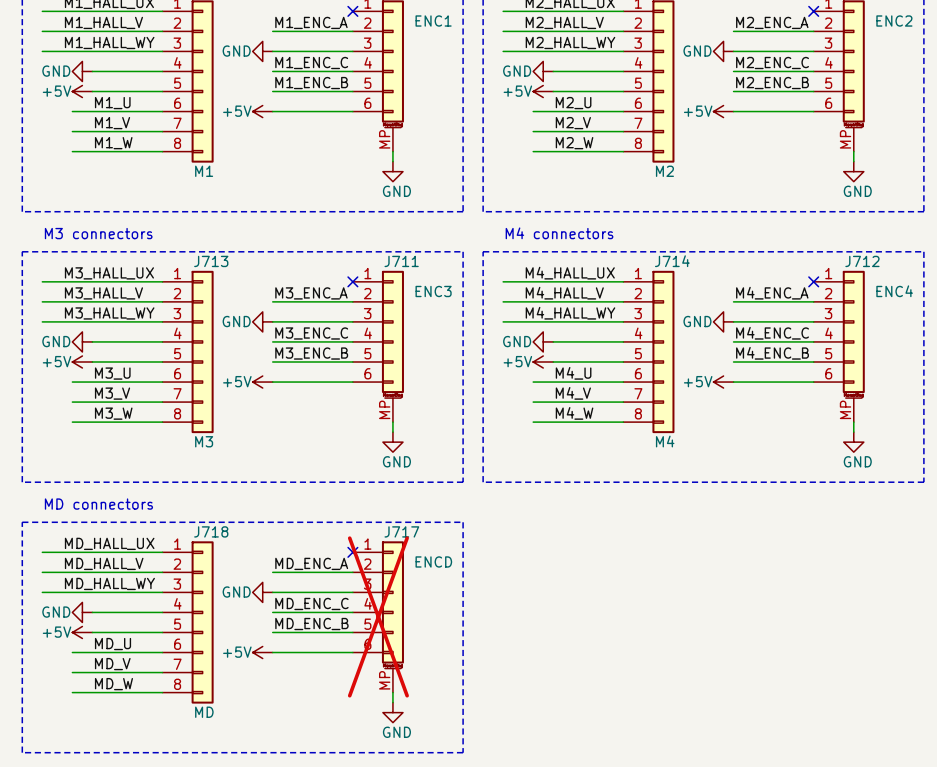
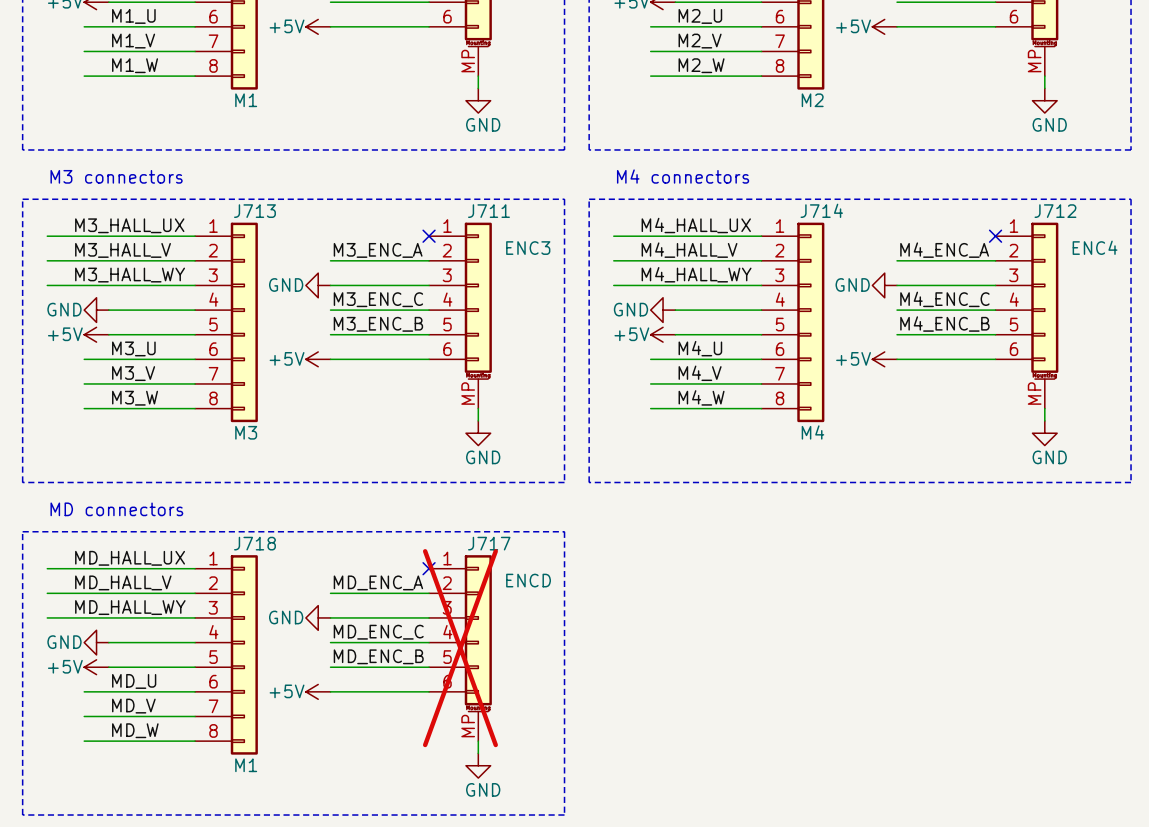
J718 value: MD (204, 712) -> M1 (246, 765)

